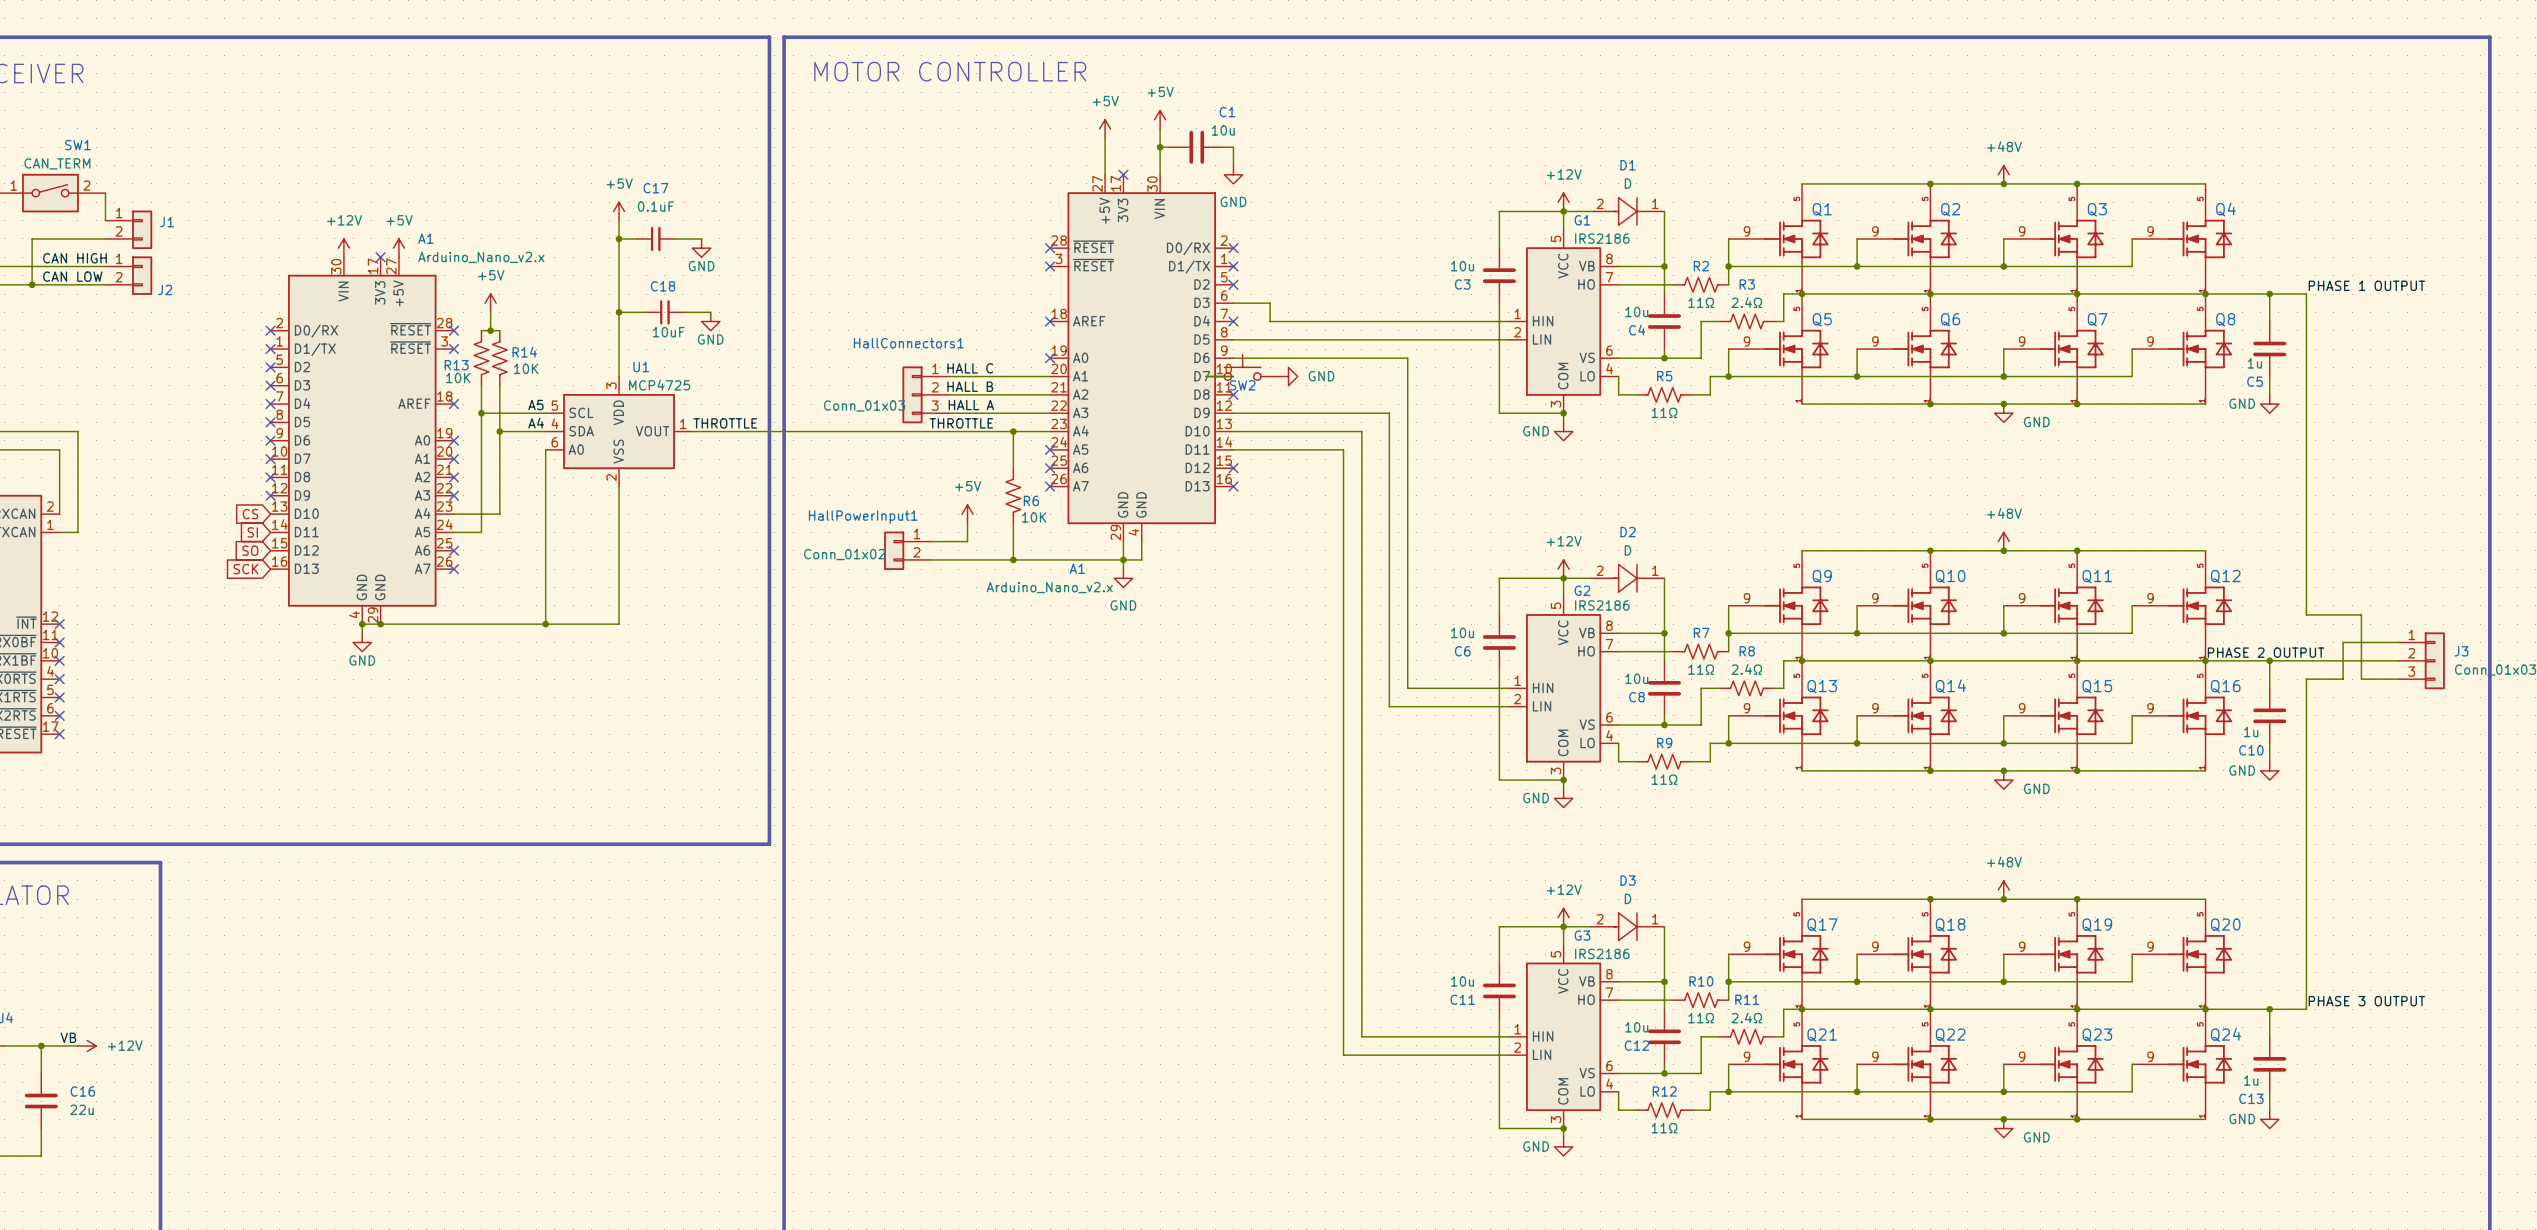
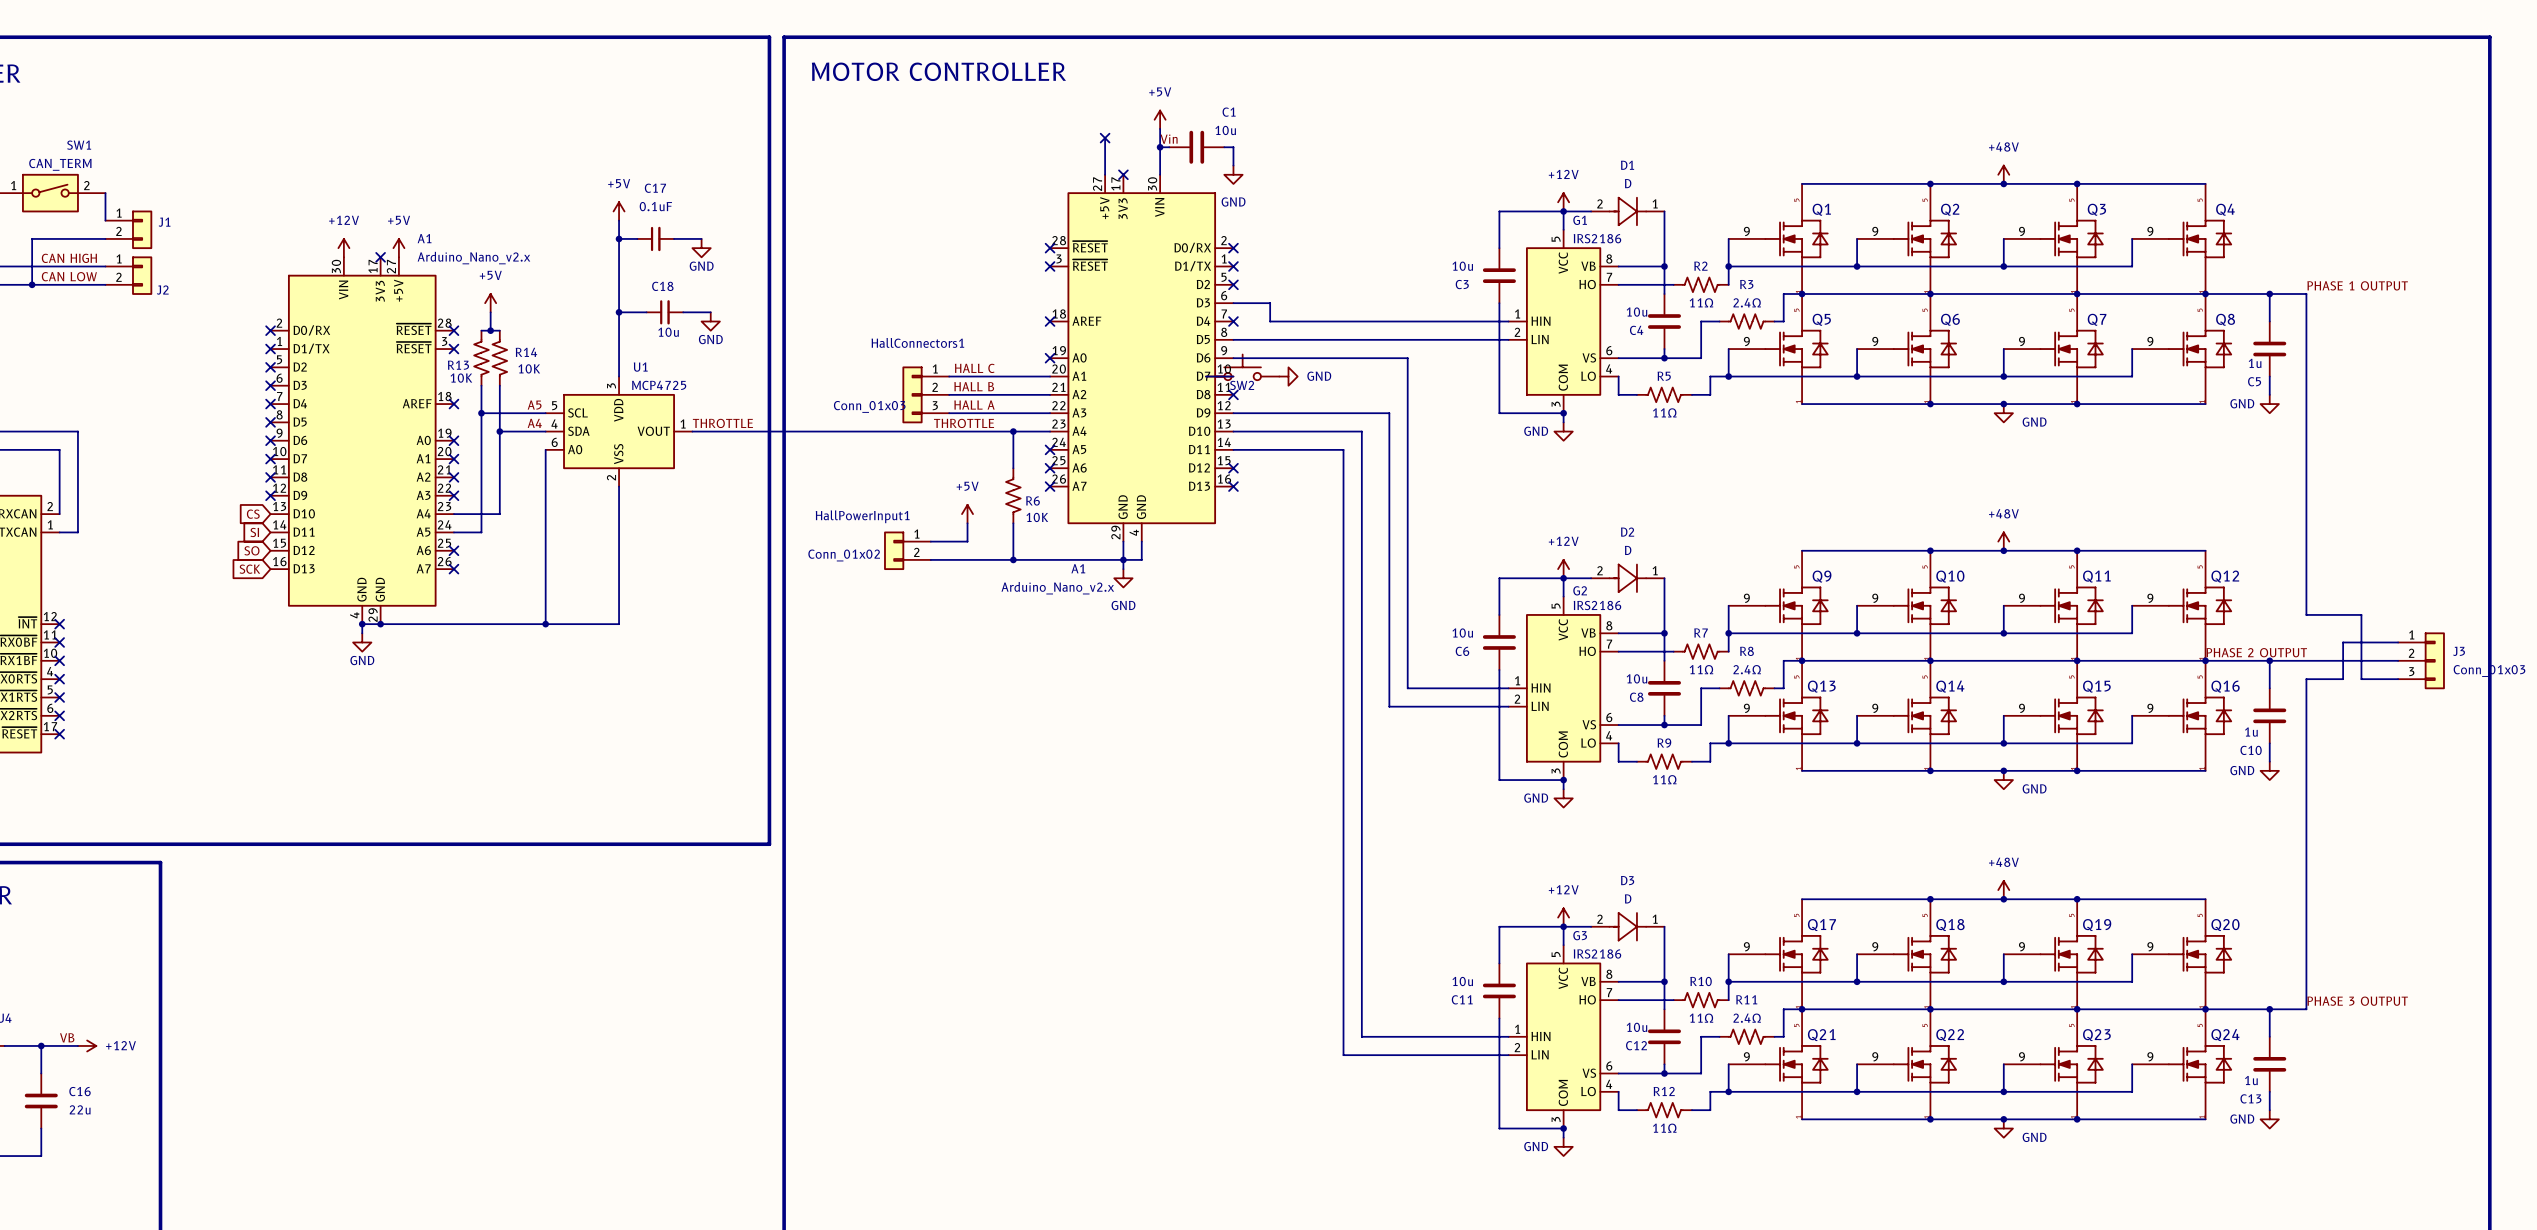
power symbol: +5V (1105, 128) -> none
no-connect mark: none -> (1105, 138)
label: none -> Vin (1169, 139)
C18 value: 10uF (668, 332) -> 10u (668, 332)

